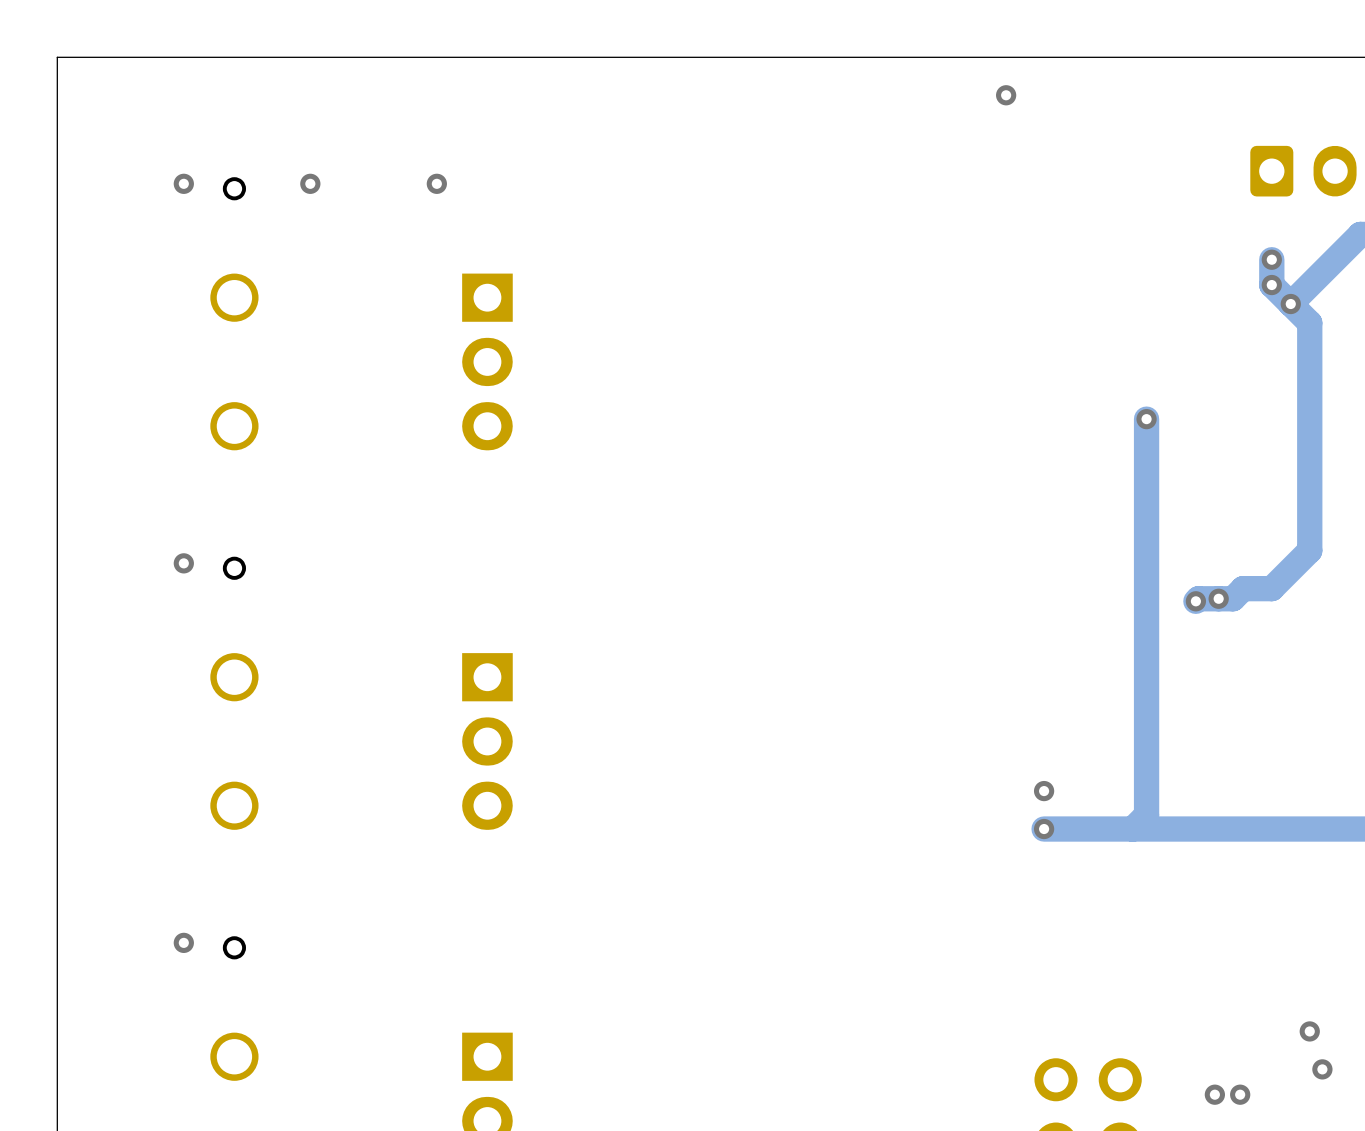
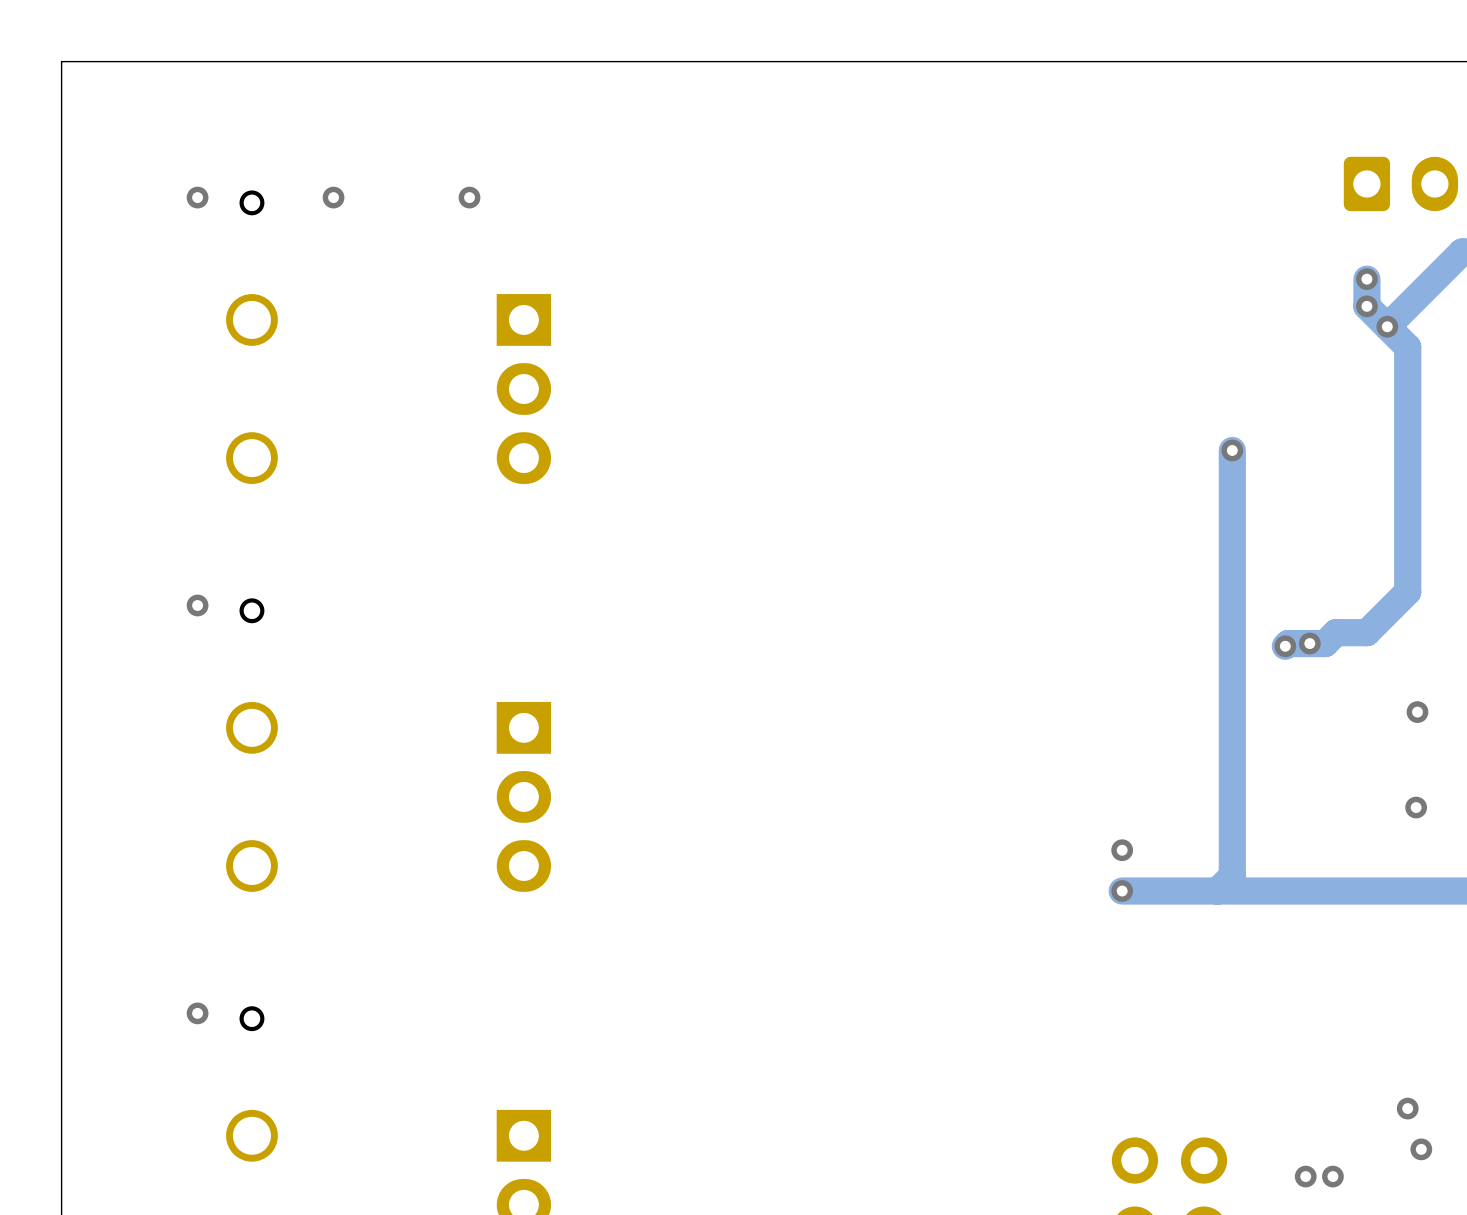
via: (1006, 95) -> none
via: none -> (1417, 712)
via: none -> (1416, 807)

